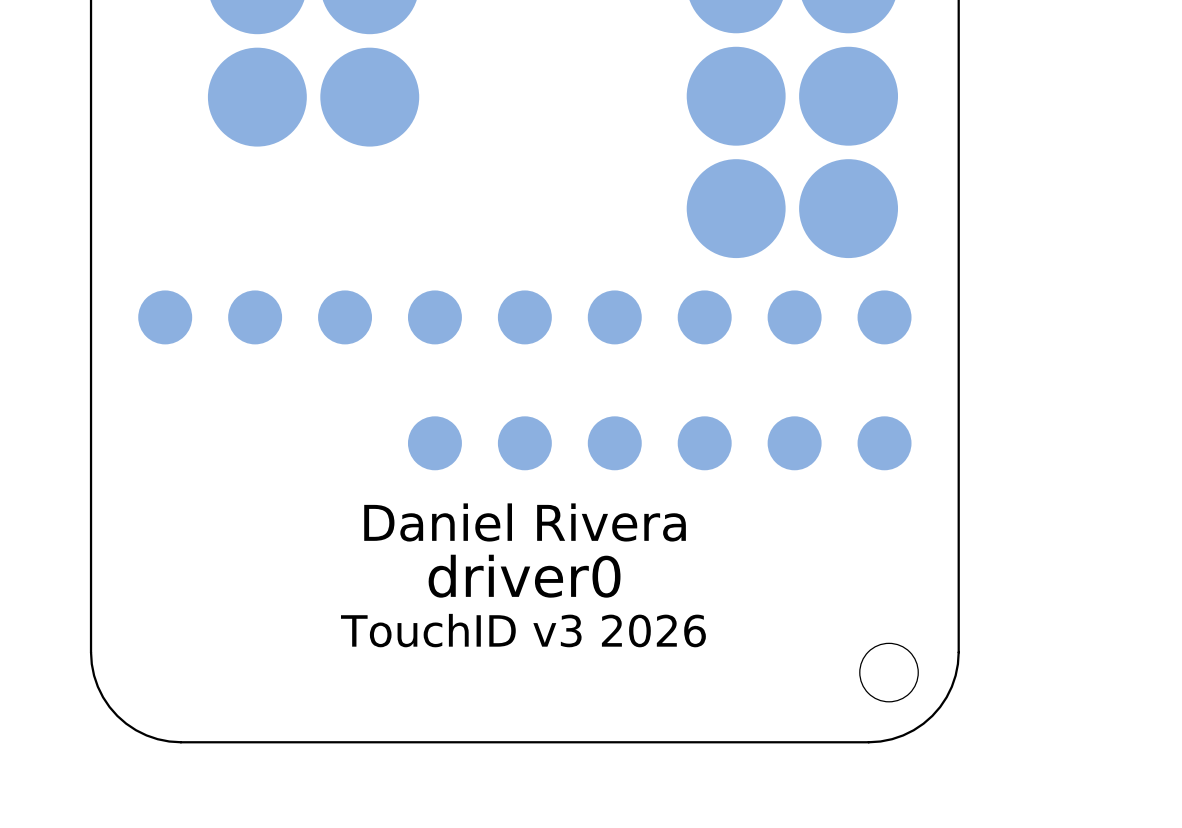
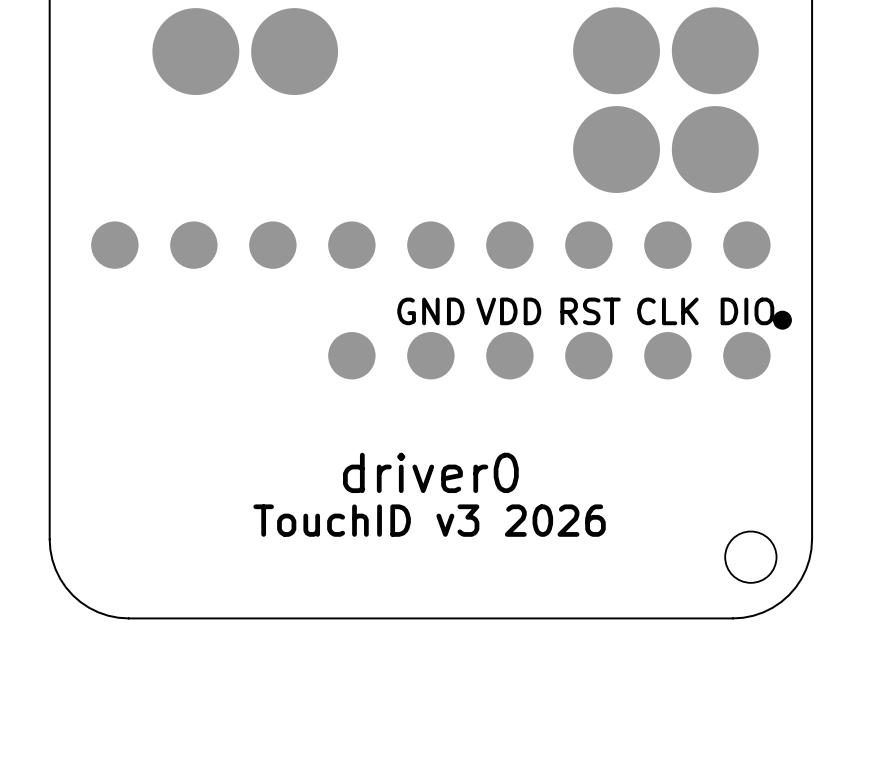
text: none -> GND (430, 311)
text: none -> VDD (508, 311)
text: none -> RST (590, 311)
text: none -> CLK (667, 311)
text: none -> DIO (747, 311)
drawing: none -> [772, 310, 792, 330]
text: Daniel Rivera (525, 522) -> none

